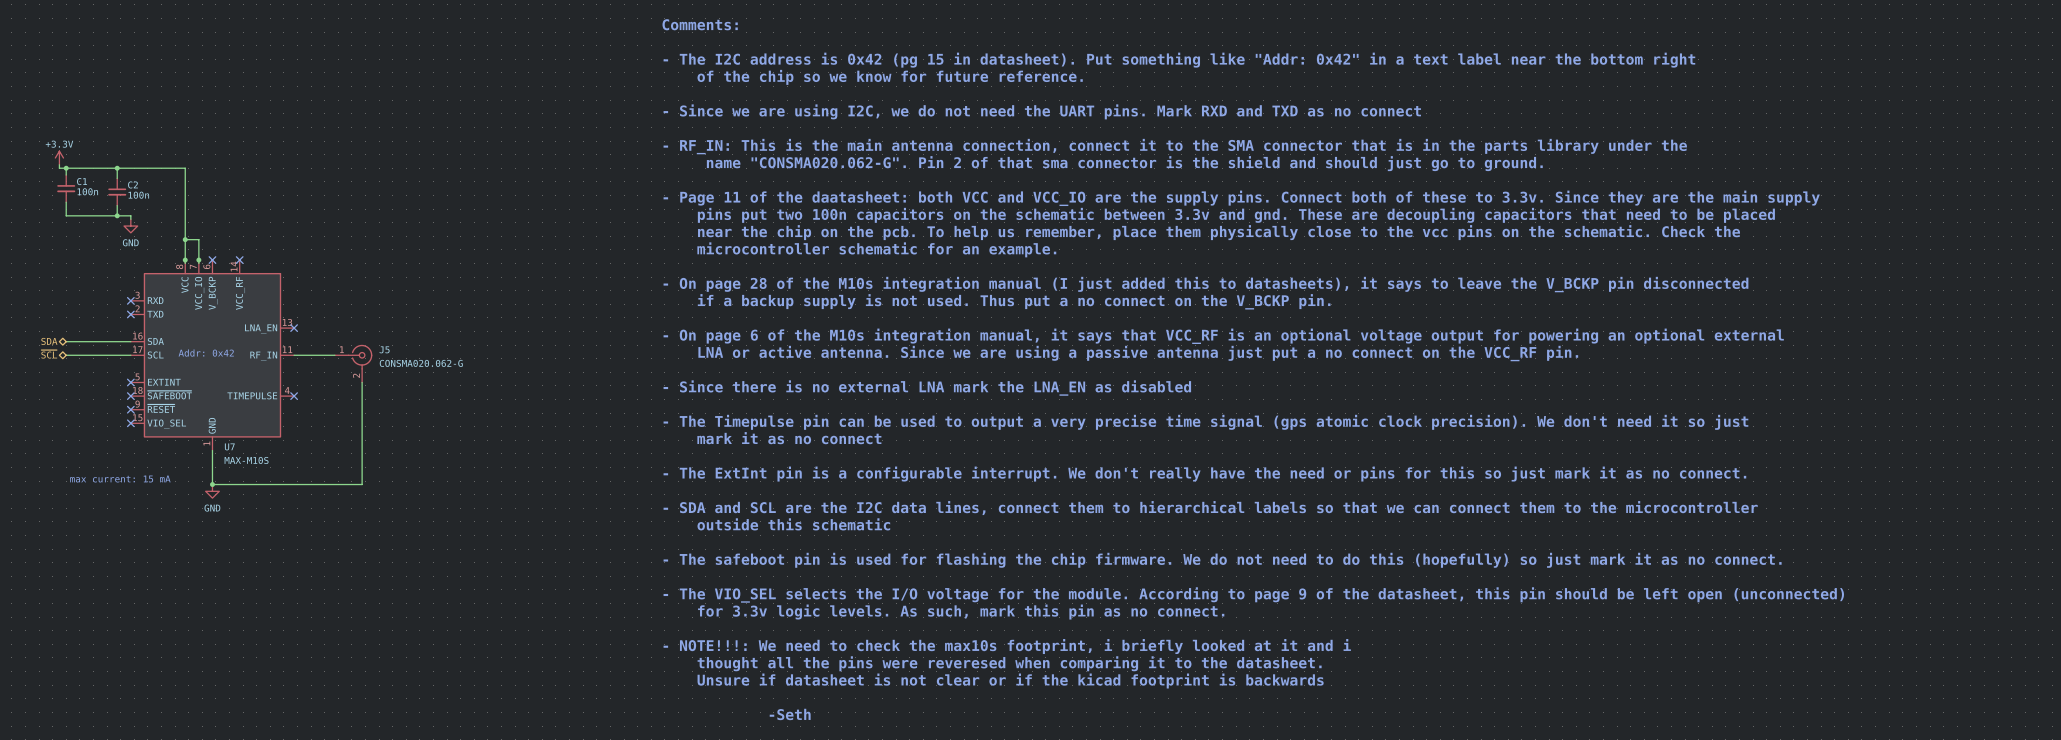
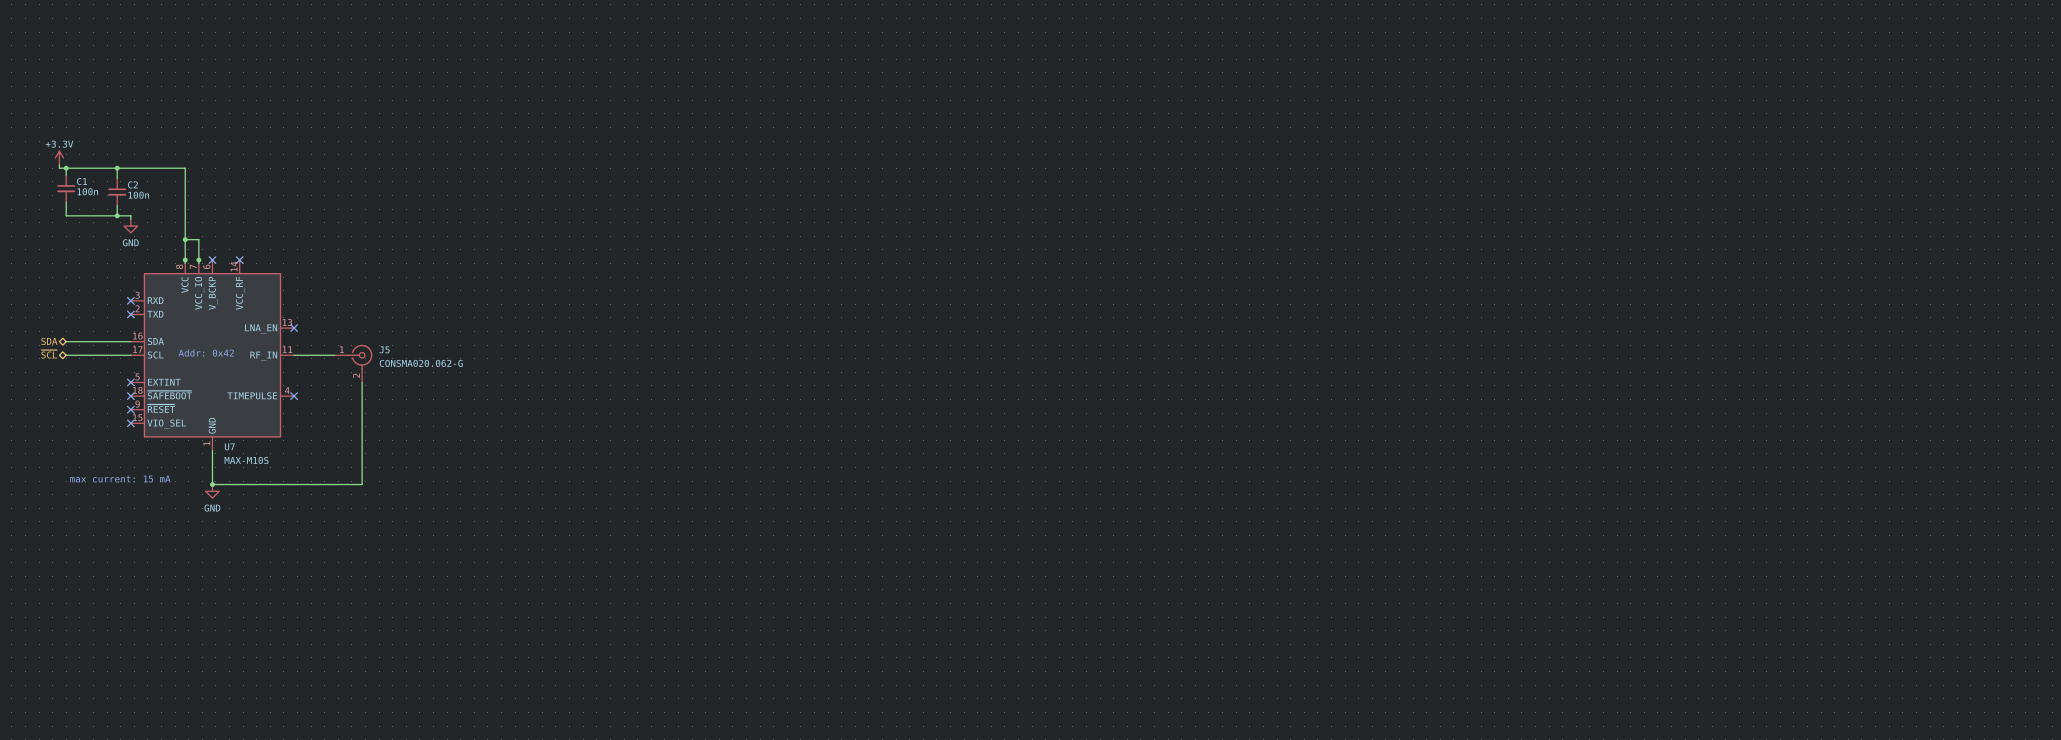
text: Comments: (700, 24) -> none
text: - The I2C address is 0x42 (pg 15 in datasheet). Put something like "Addr: 0x42" in a text label near the bottom right (1179, 60) -> none
text: of the chip so we know for future reference. (890, 77) -> none
text: - Since we are using I2C, we do not need the UART pins. Mark RXD and TXD as no connect (1042, 111) -> none
text: - RF_IN: This is the main antenna connection, connect it to the SMA connector that is in the parts library under the (1175, 146) -> none
text: name "CONSMA020.062-G". Pin 2 of that sma connector is the shield and should just go to ground. (1124, 163) -> none
text: - Page 11 of the daatasheet: both VCC and VCC_IO are the supply pins. Connect both of these to 3.3v. Since they are the main supply (1241, 198) -> none
text: pins put two 100n capacitors on the schematic between 3.3v and gnd. These are decoupling capacitors that need to be placed (1236, 215) -> none
text: near the chip on the pcb. To help us remember, place them physically close to the vcc pins on the schematic. Check the (1219, 232) -> none
text: microcontroller schematic for an example. (876, 249) -> none
text: - On page 28 of the M10s integration manual (I just added this to datasheets), it says to leave the V_BCKP pin disconnected (1205, 284) -> none
text: if a backup supply is not used. Thus put a no connect on the V_BCKP pin. (1014, 301) -> none
text: - On page 6 of the M10s integration manual, it says that VCC_RF is an optional voltage output for powering an optional external (1223, 336) -> none
text: LNA or active antenna. Since we are using a passive antenna just put a no connect on the VCC_RF pin. (1138, 353) -> none
text: - Since there is no external LNA mark the LNA_EN as disabled (927, 388) -> none
text: - The Timepulse pin can be used to output a very precise time signal (gps atomic clock precision). We don't need it so just (1205, 422) -> none
text: mark it as no connect (789, 438) -> none
text: - The ExtInt pin is a configurable interrupt. We don't really have the need or pins for this so just mark it as no connect. (1204, 474) -> none
text: - SDA and SCL are the I2C data lines, connect them to hierarchical labels so that we can connect them to the microcontroller (1210, 508) -> none
text: outside this schematic (793, 524) -> none
text: - The safeboot pin is used for flashing the chip firmware. We do not need to do this (hopefully) so just mark it as no connect. (1222, 560) -> none
text: - The VIO_SEL selects the I/O voltage for the module. According to page 9 of the datasheet, this pin should be left open (unconnected) (1253, 594) -> none
text: for 3.3v logic levels. As such, mark this pin as no connect. (961, 612) -> none
text: - NOTE!!!: We need to check the max10s footprint, i briefly looked at it and i (1007, 646) -> none
text: thought all the pins were reveresed when comparing it to the datasheet. (1009, 663) -> none
text: Unsure if datasheet is not clear or if the kicad footprint is backwards (1010, 681) -> none
text: -Seth (790, 714) -> none

